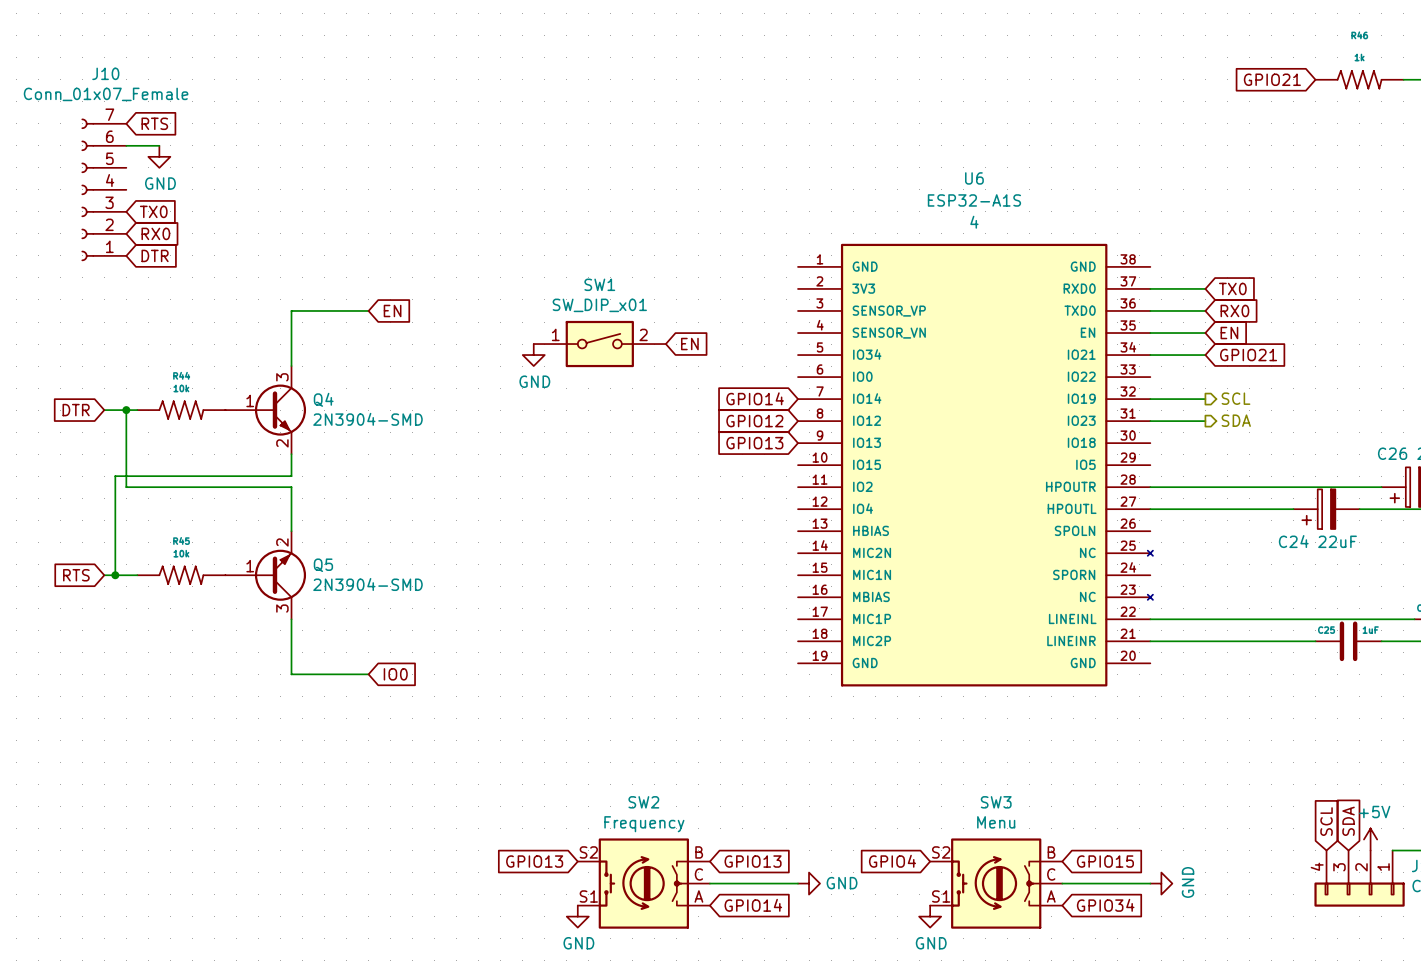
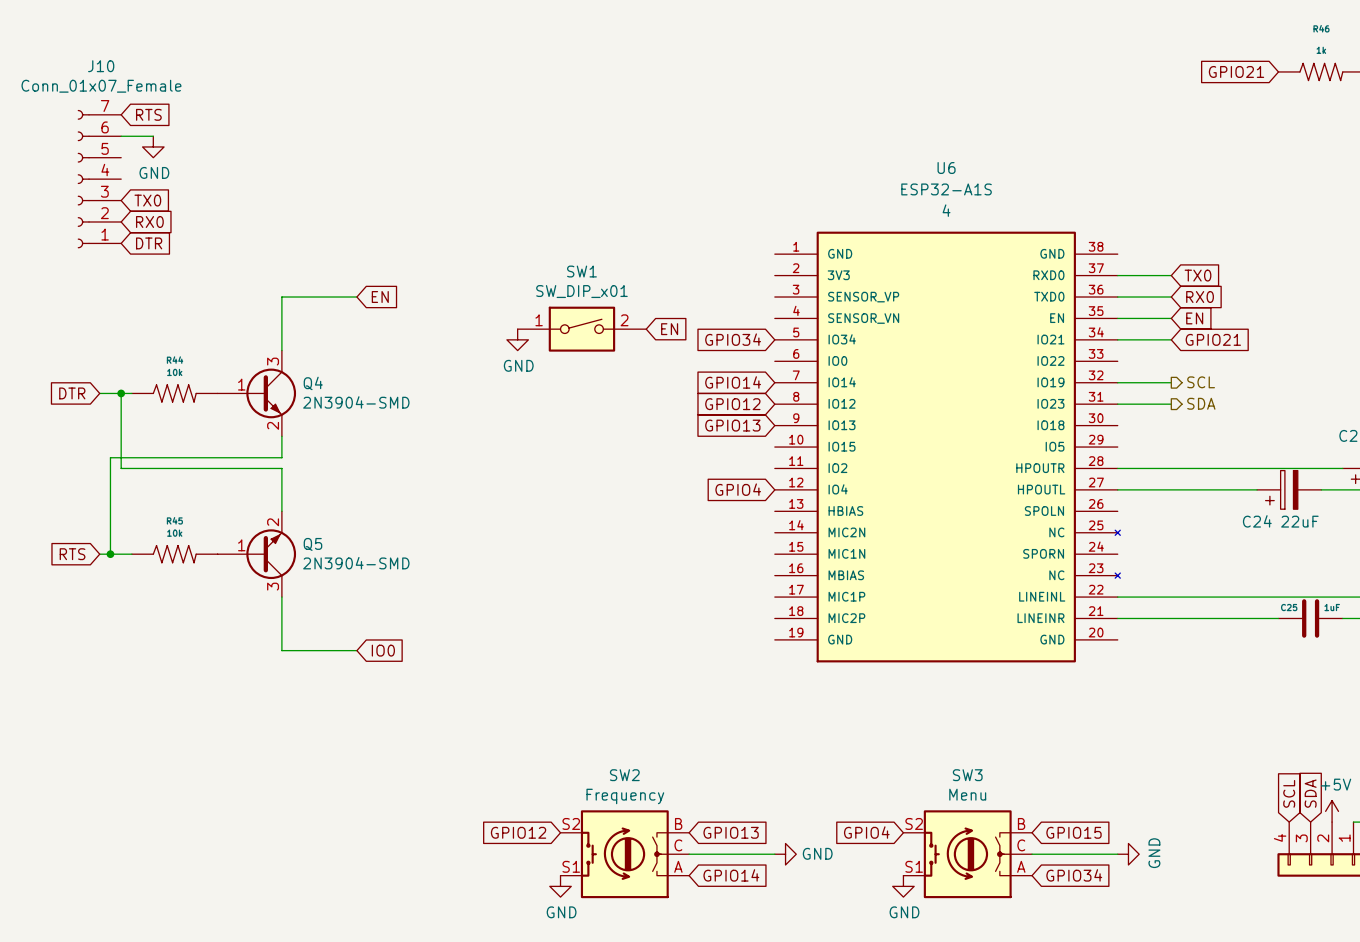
global label: none -> GPIO34 (733, 339)
global label: none -> GPIO4 (738, 489)
global label: GPIO13 (534, 861) -> GPIO12 (518, 832)

